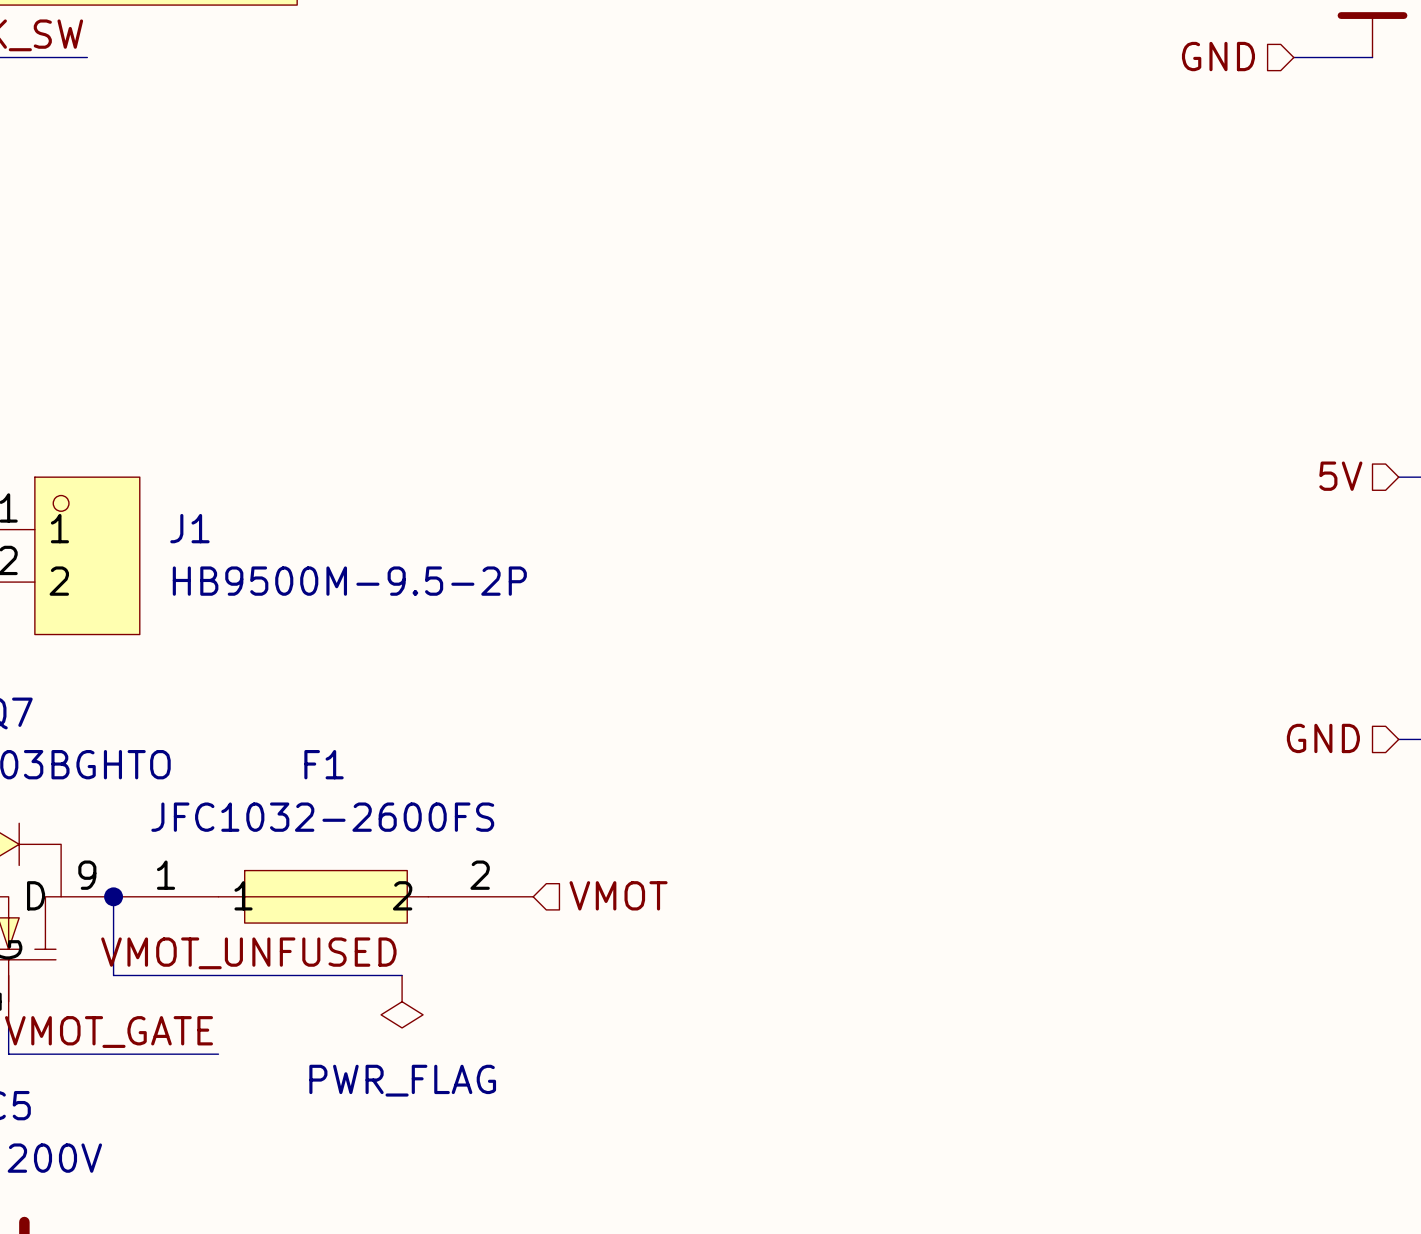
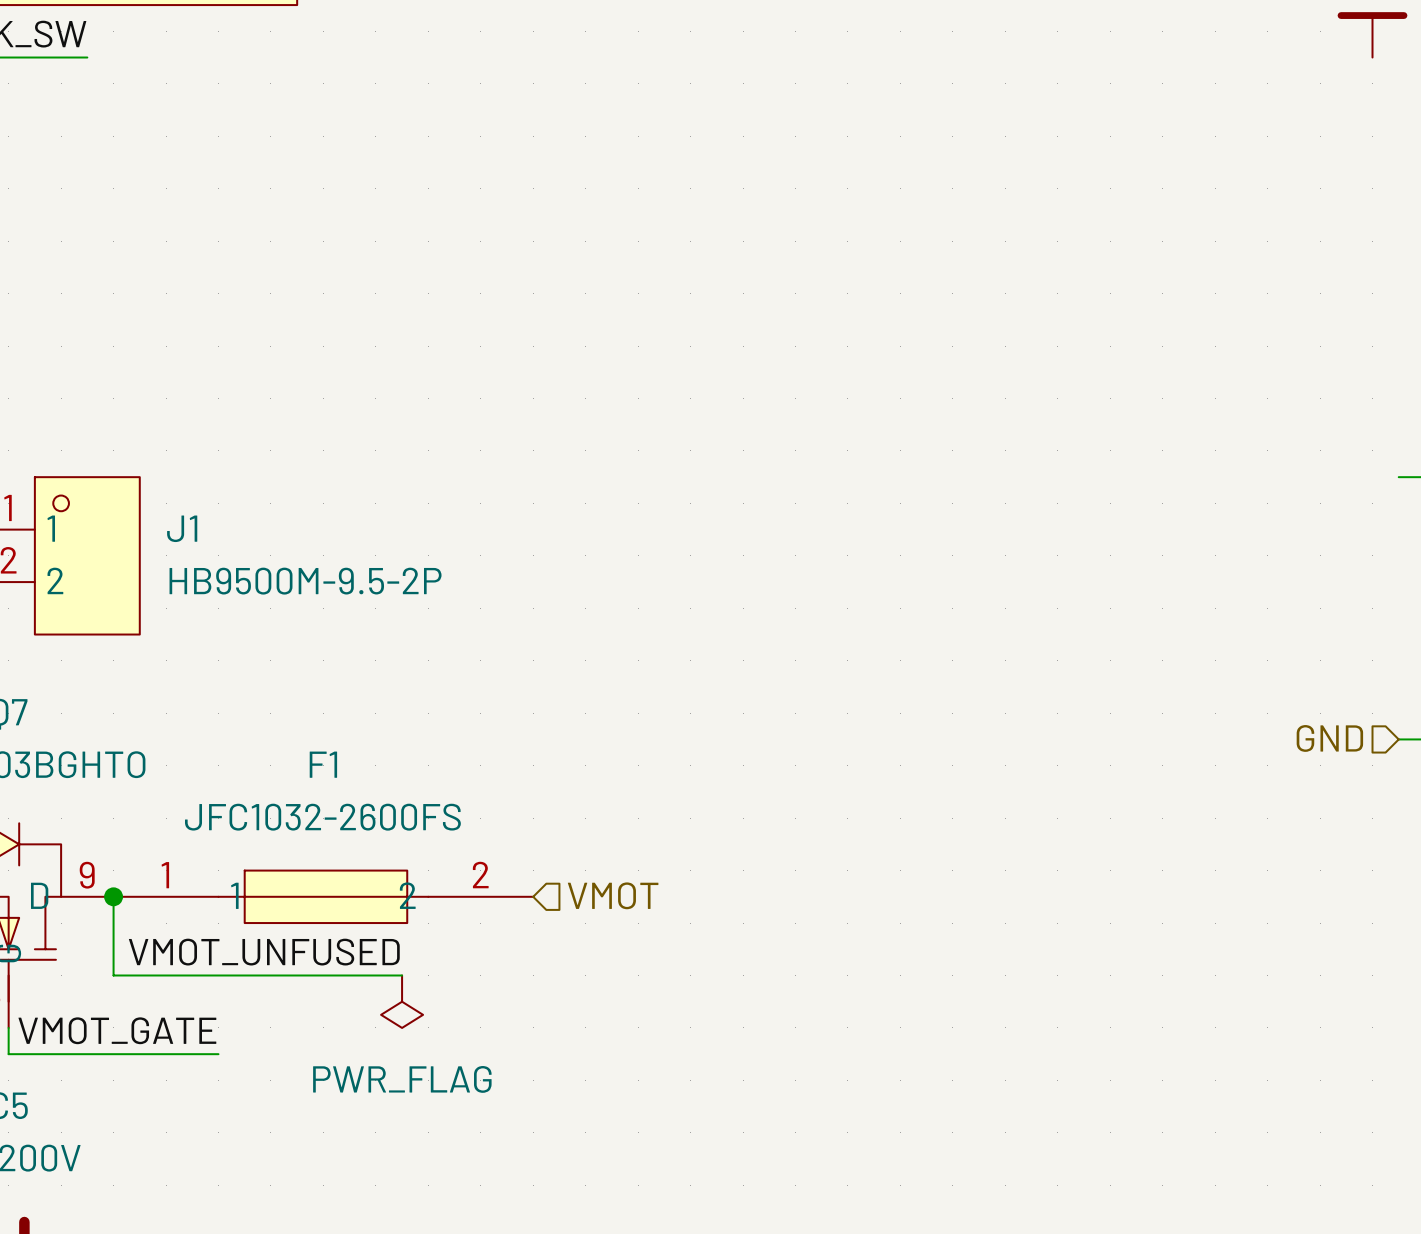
hierarchical label: GND (1218, 56) -> none
wire: (1293, 57) (1372, 57) -> none
hierarchical label: 5V (1340, 476) -> none

